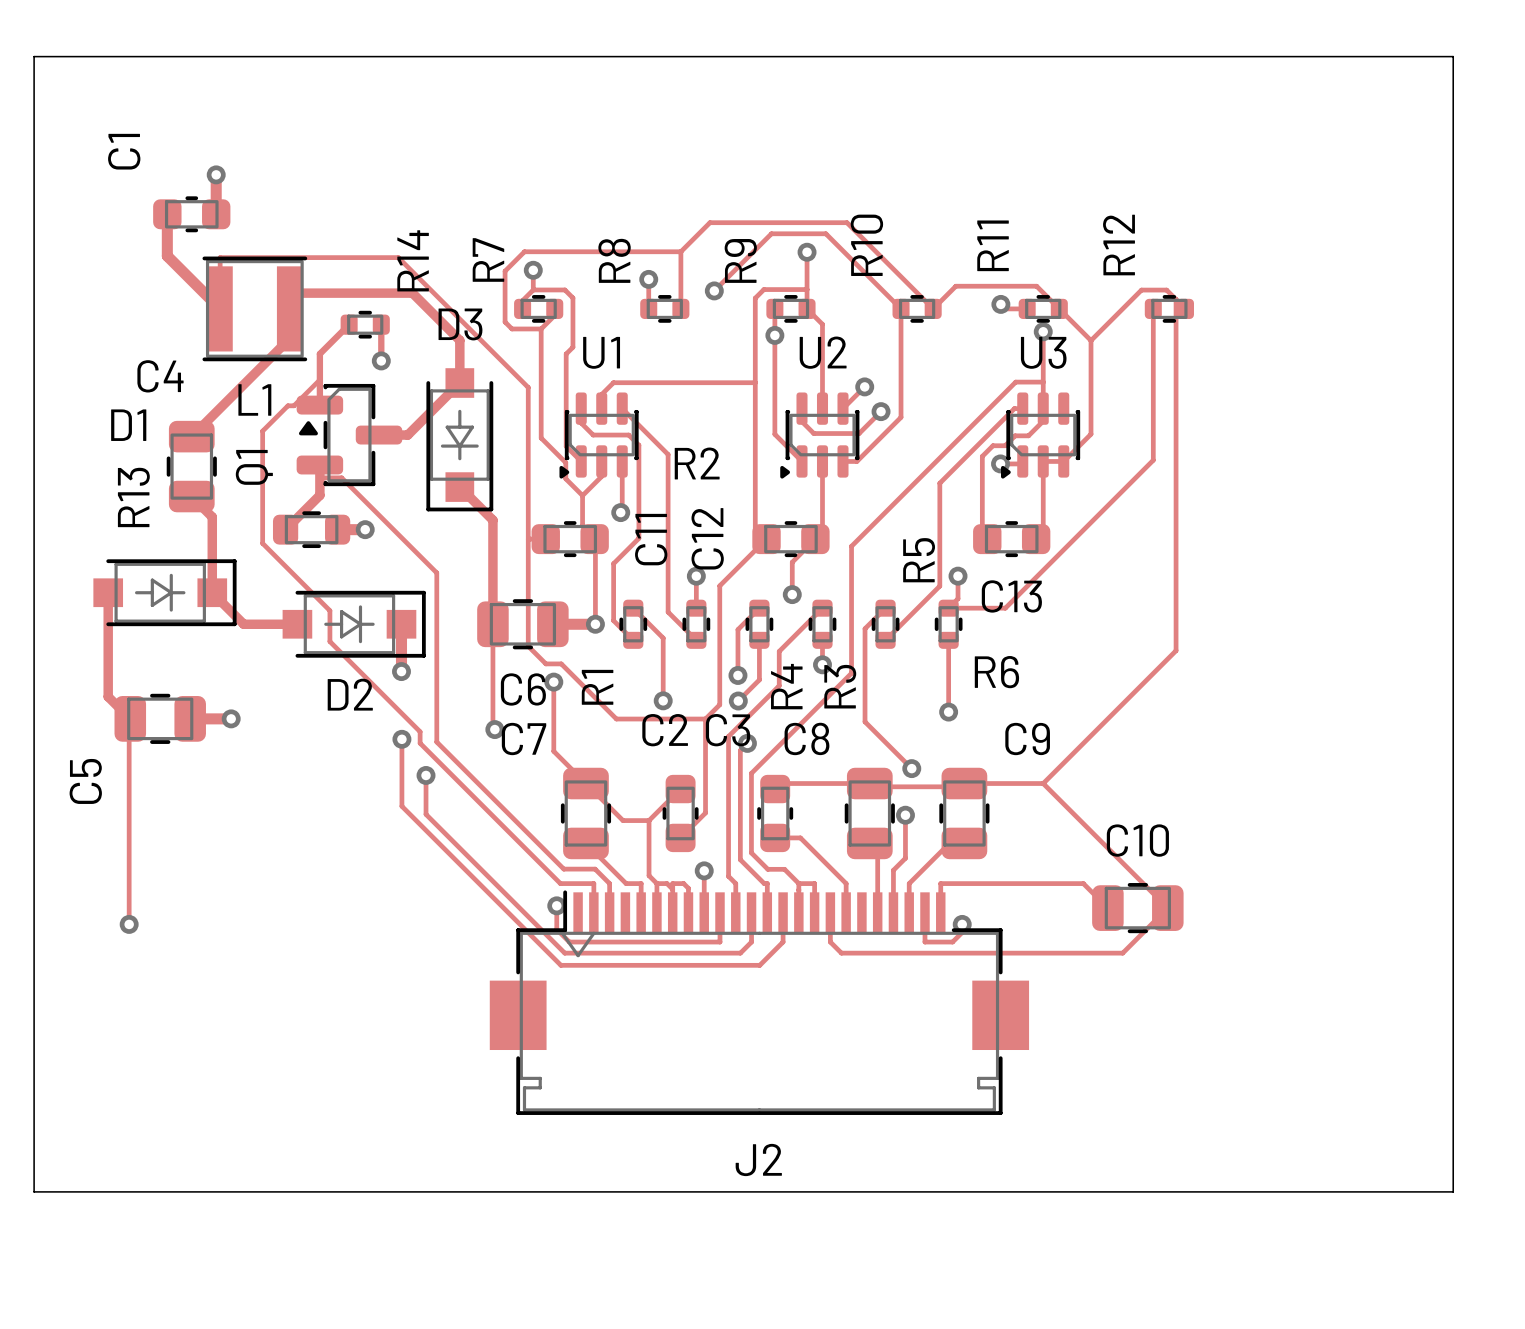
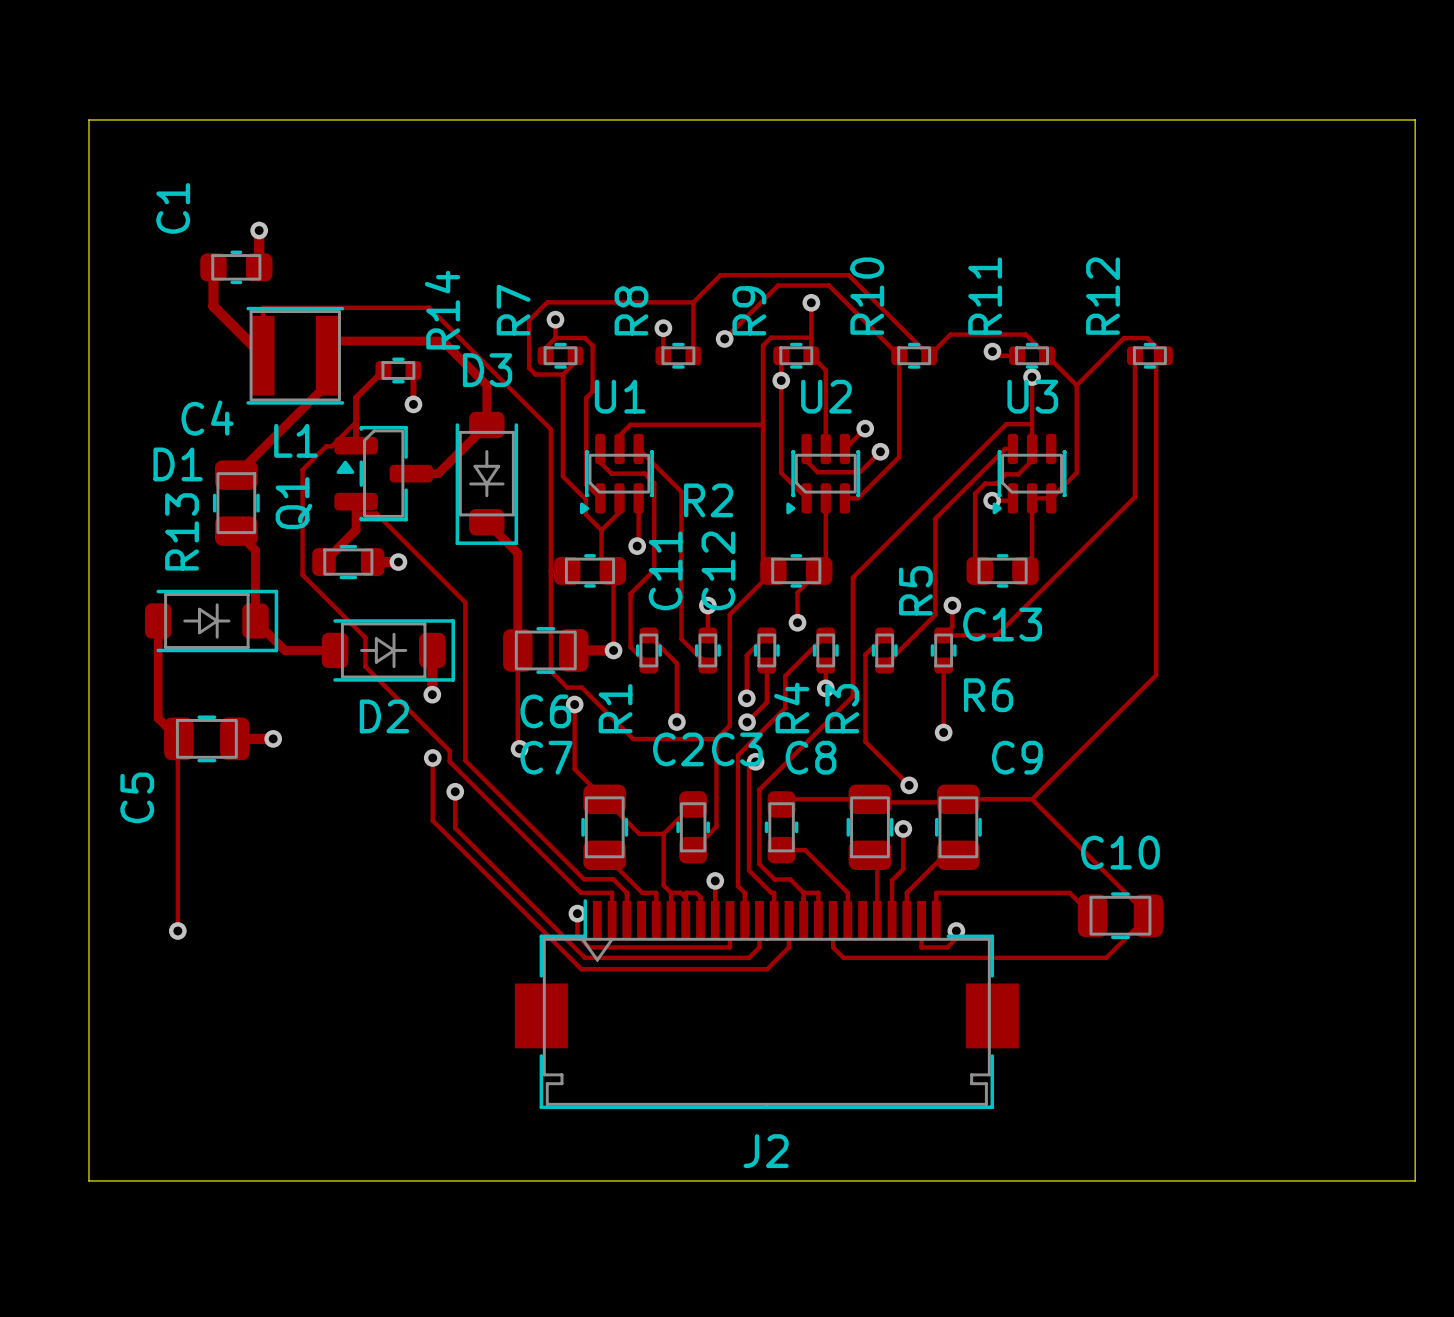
D3 footprint: [426, 368, 494, 512] -> [455, 411, 519, 545]
D1 footprint: [93, 559, 237, 627] -> [144, 589, 279, 653]
D2 footprint: [282, 590, 426, 658] -> [321, 619, 456, 682]

